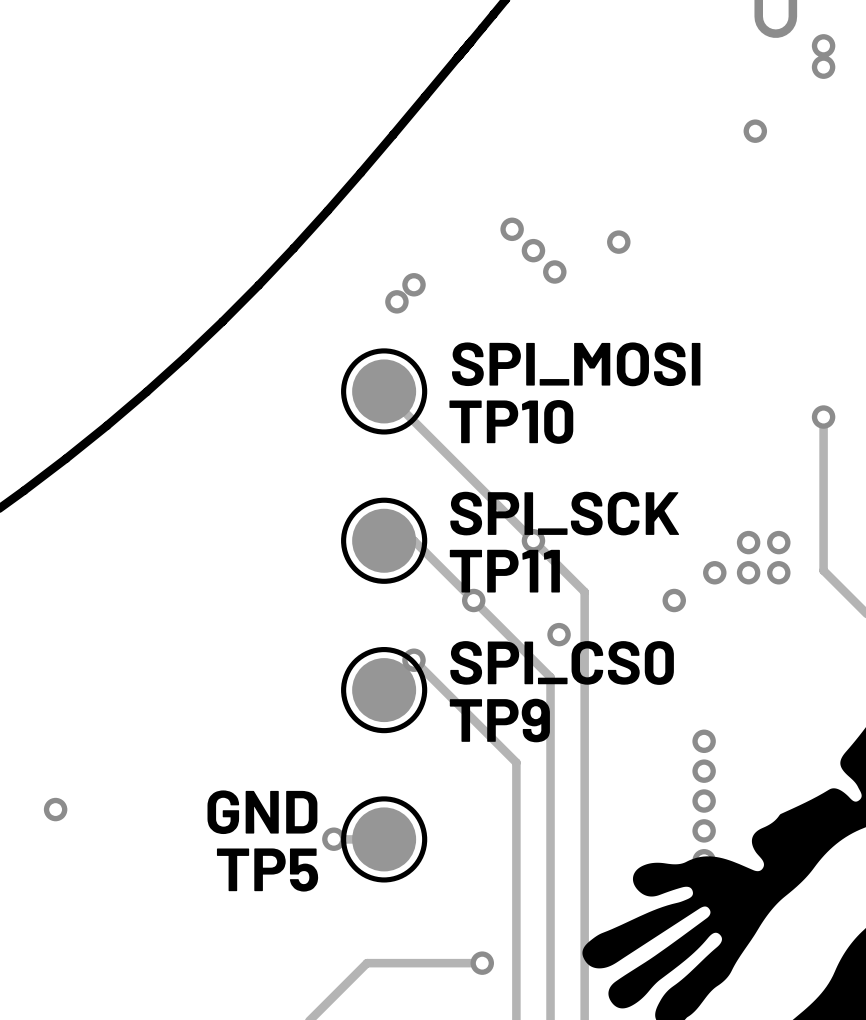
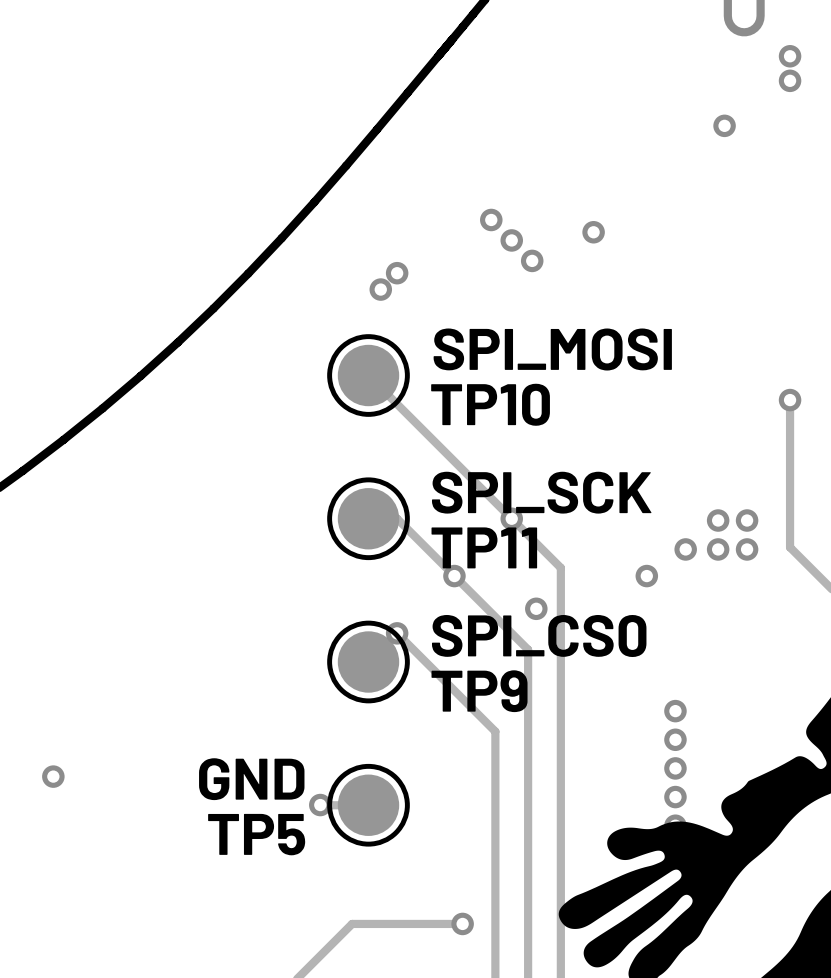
via: (823, 45) -> none
via: none -> (790, 56)
via: (823, 67) -> none
via: none -> (790, 80)

